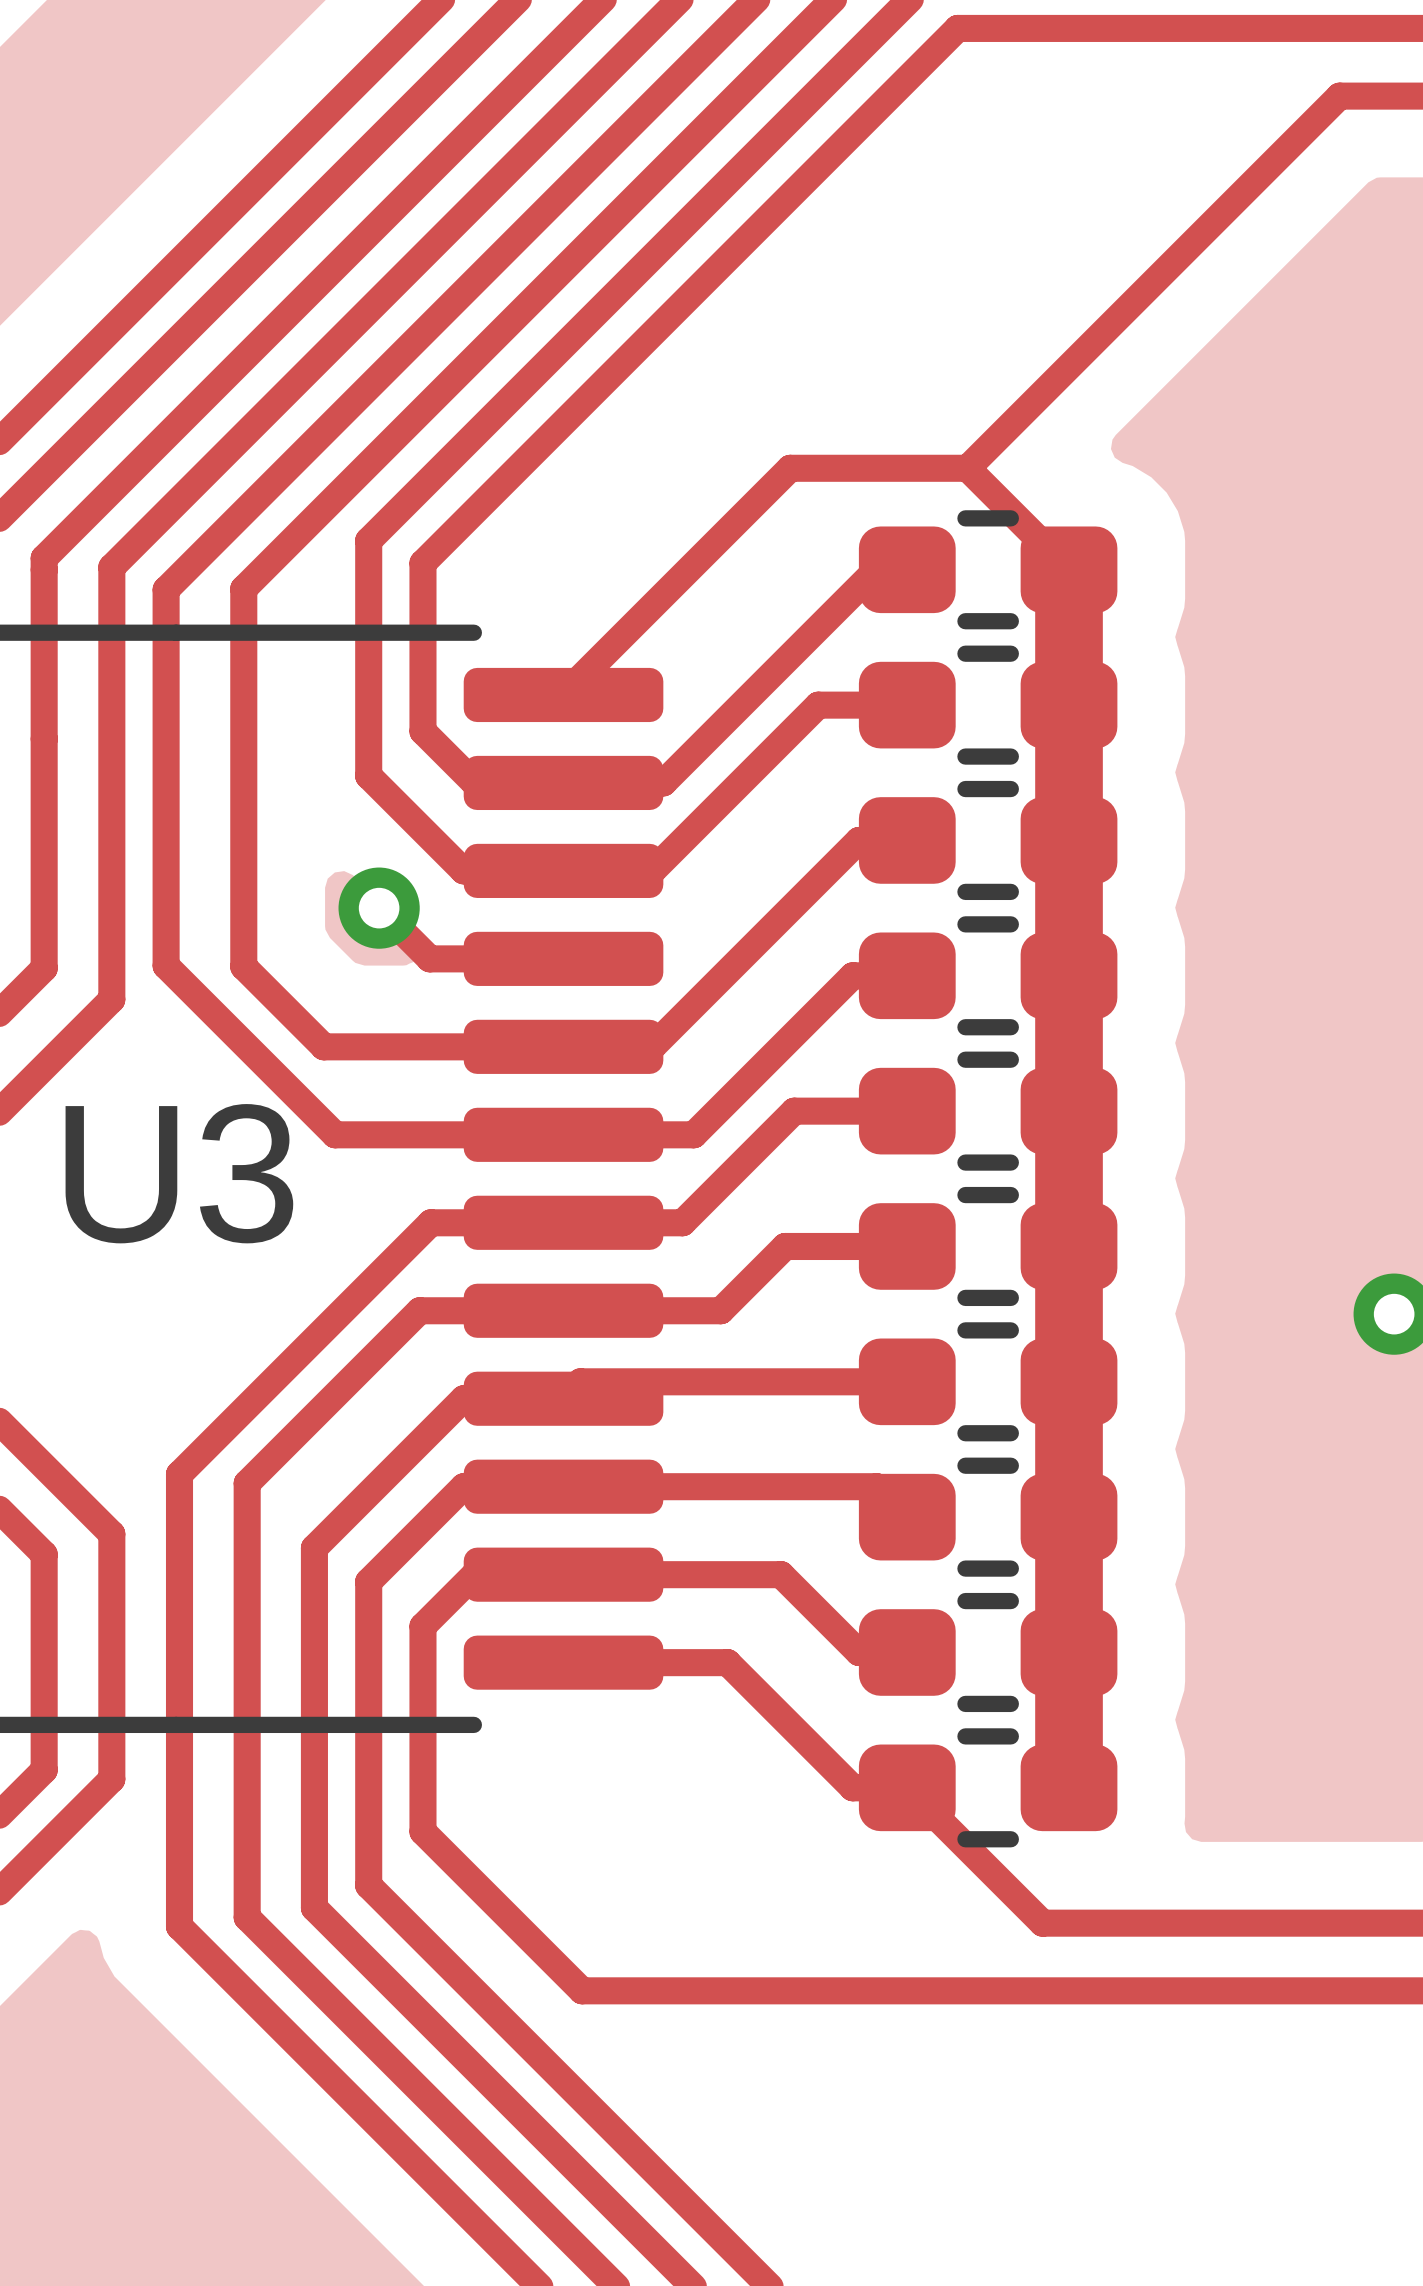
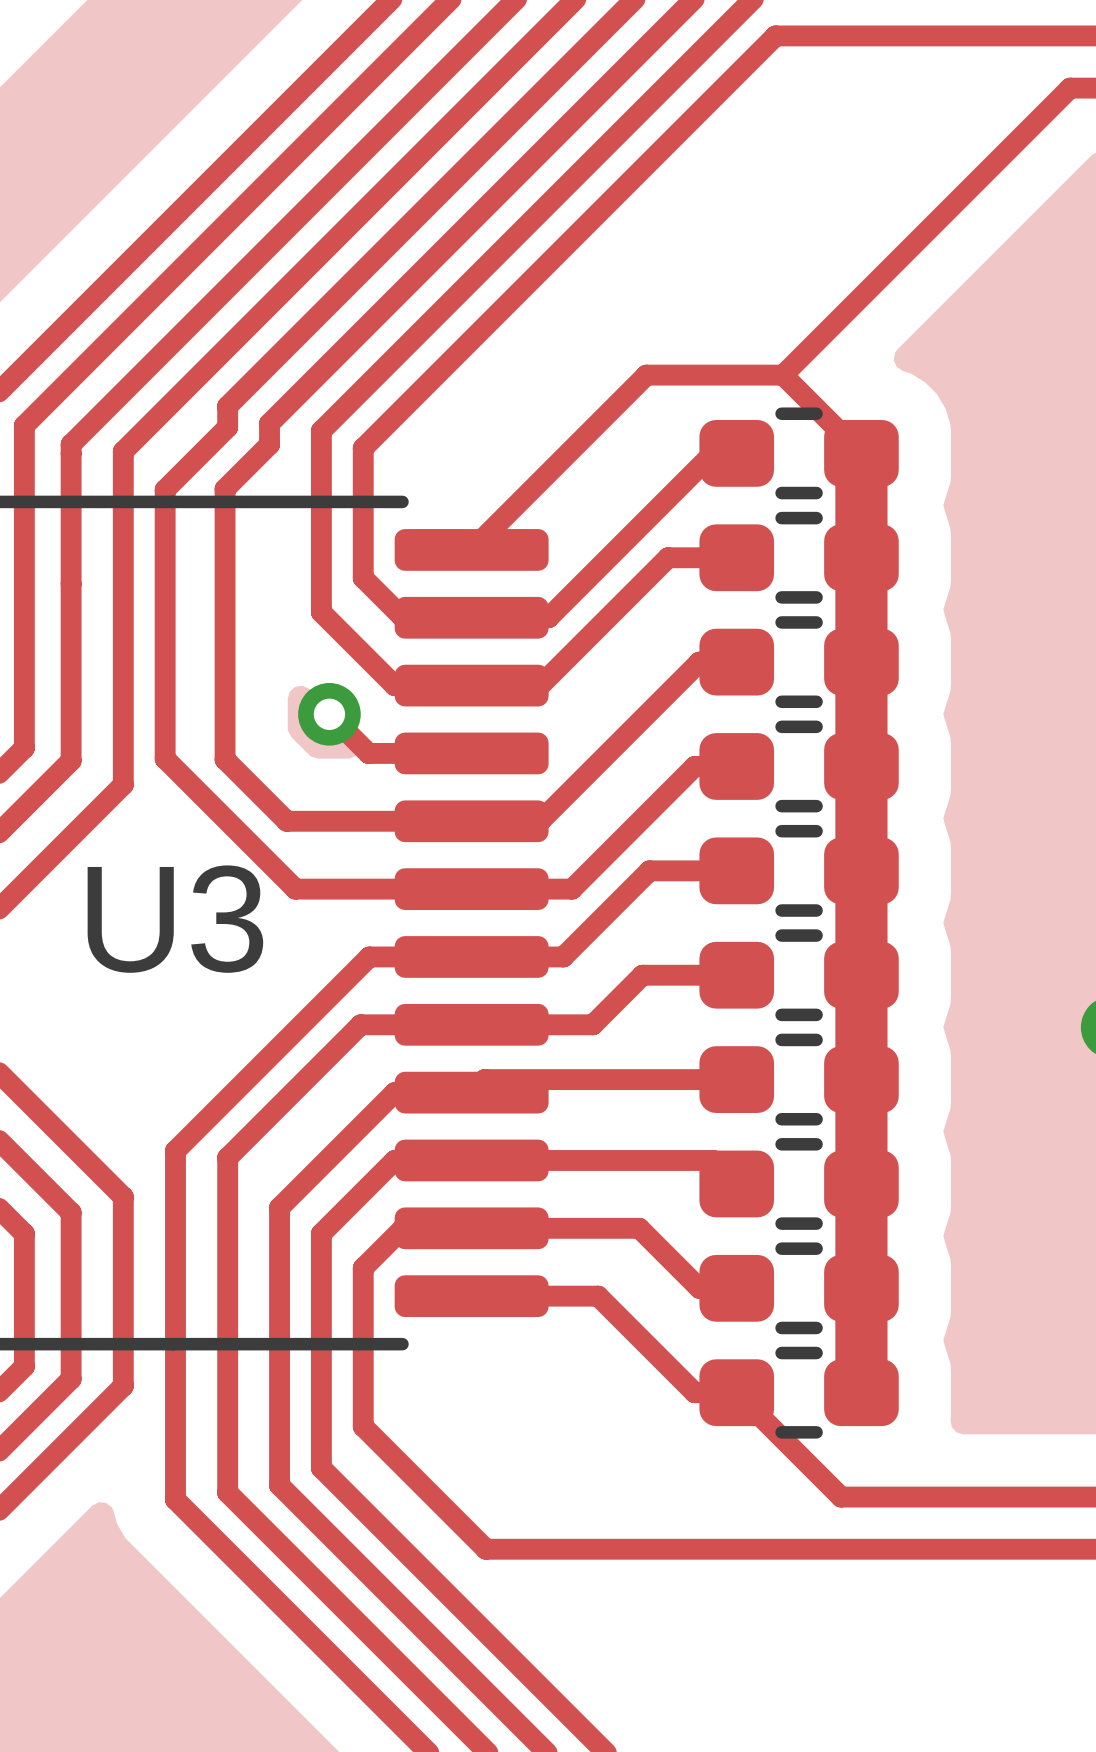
track: (247, 508) (166, 589) (166, 617) -> (227, 406) (227, 427) (165, 489)
track: (301, 531) (243, 588) (243, 616) -> (269, 423) (269, 444) (225, 489)

